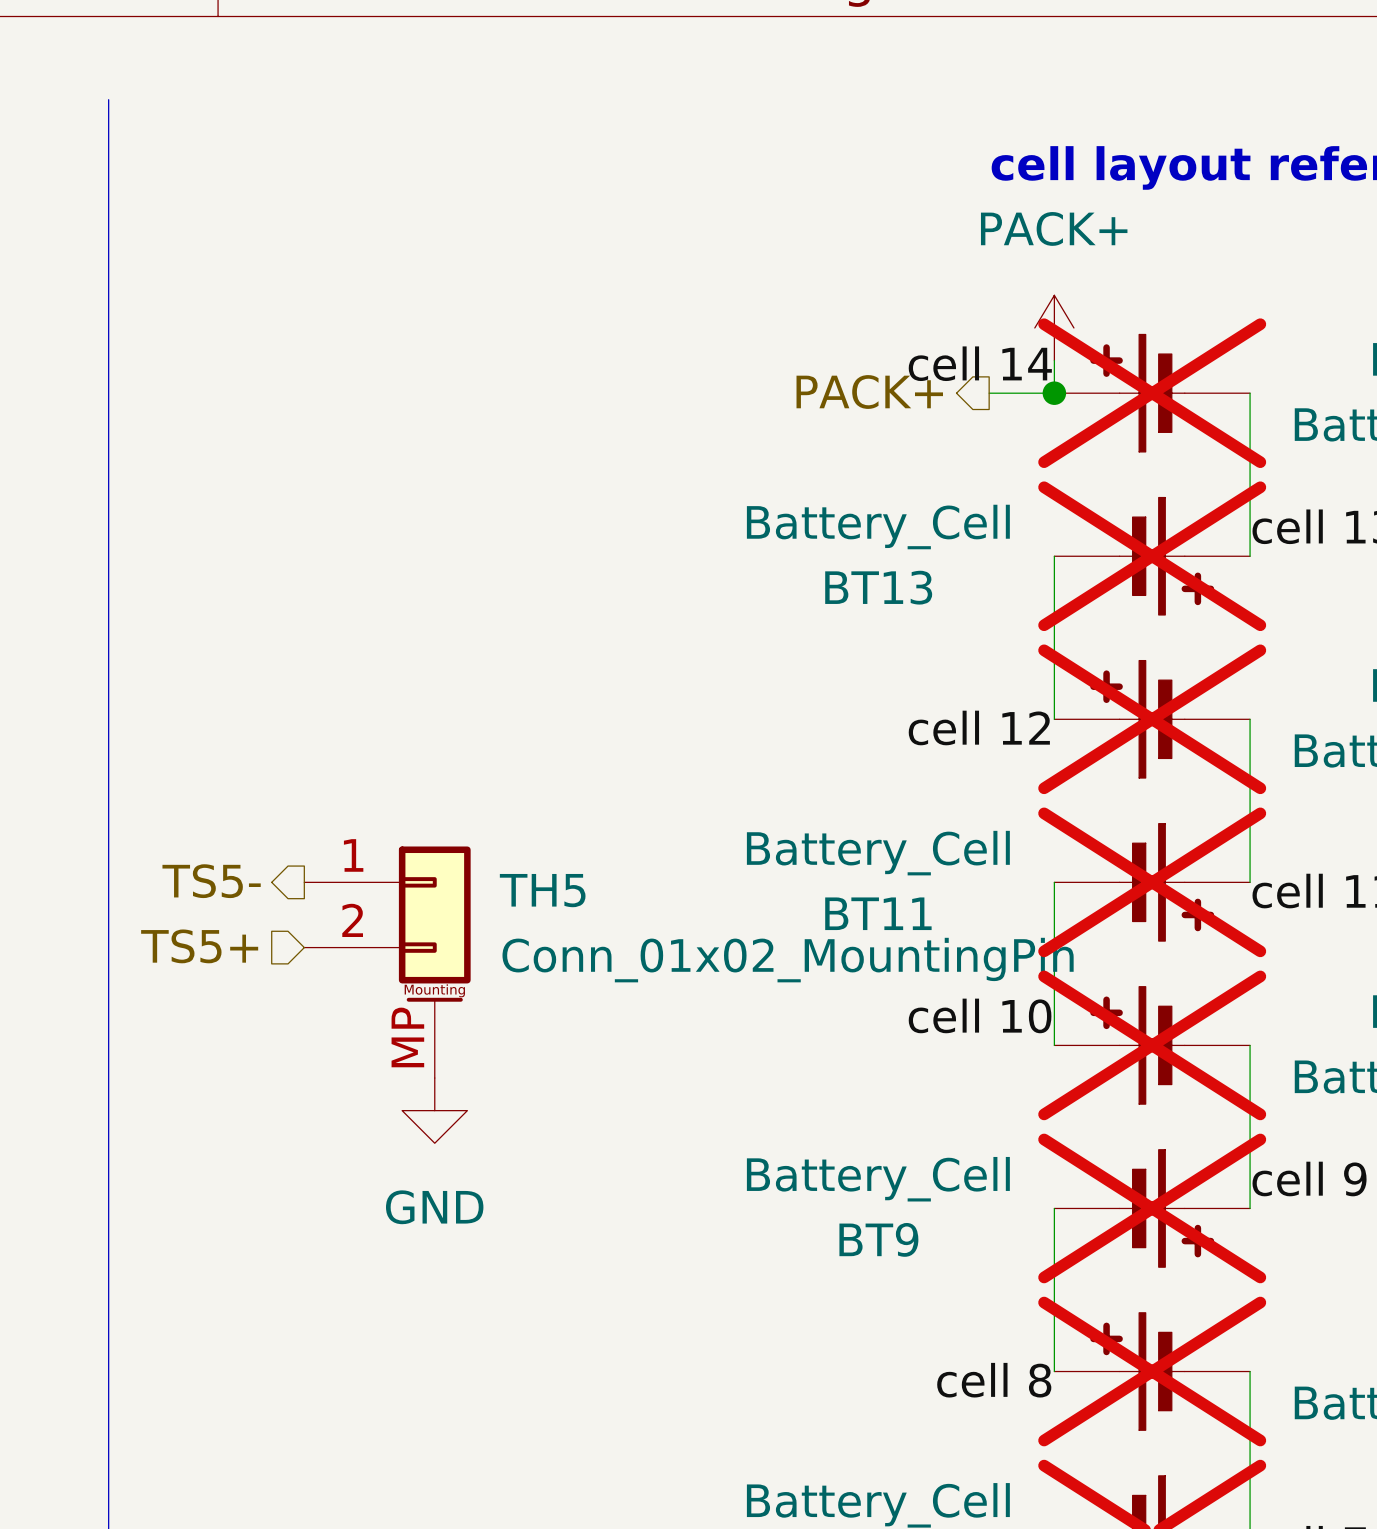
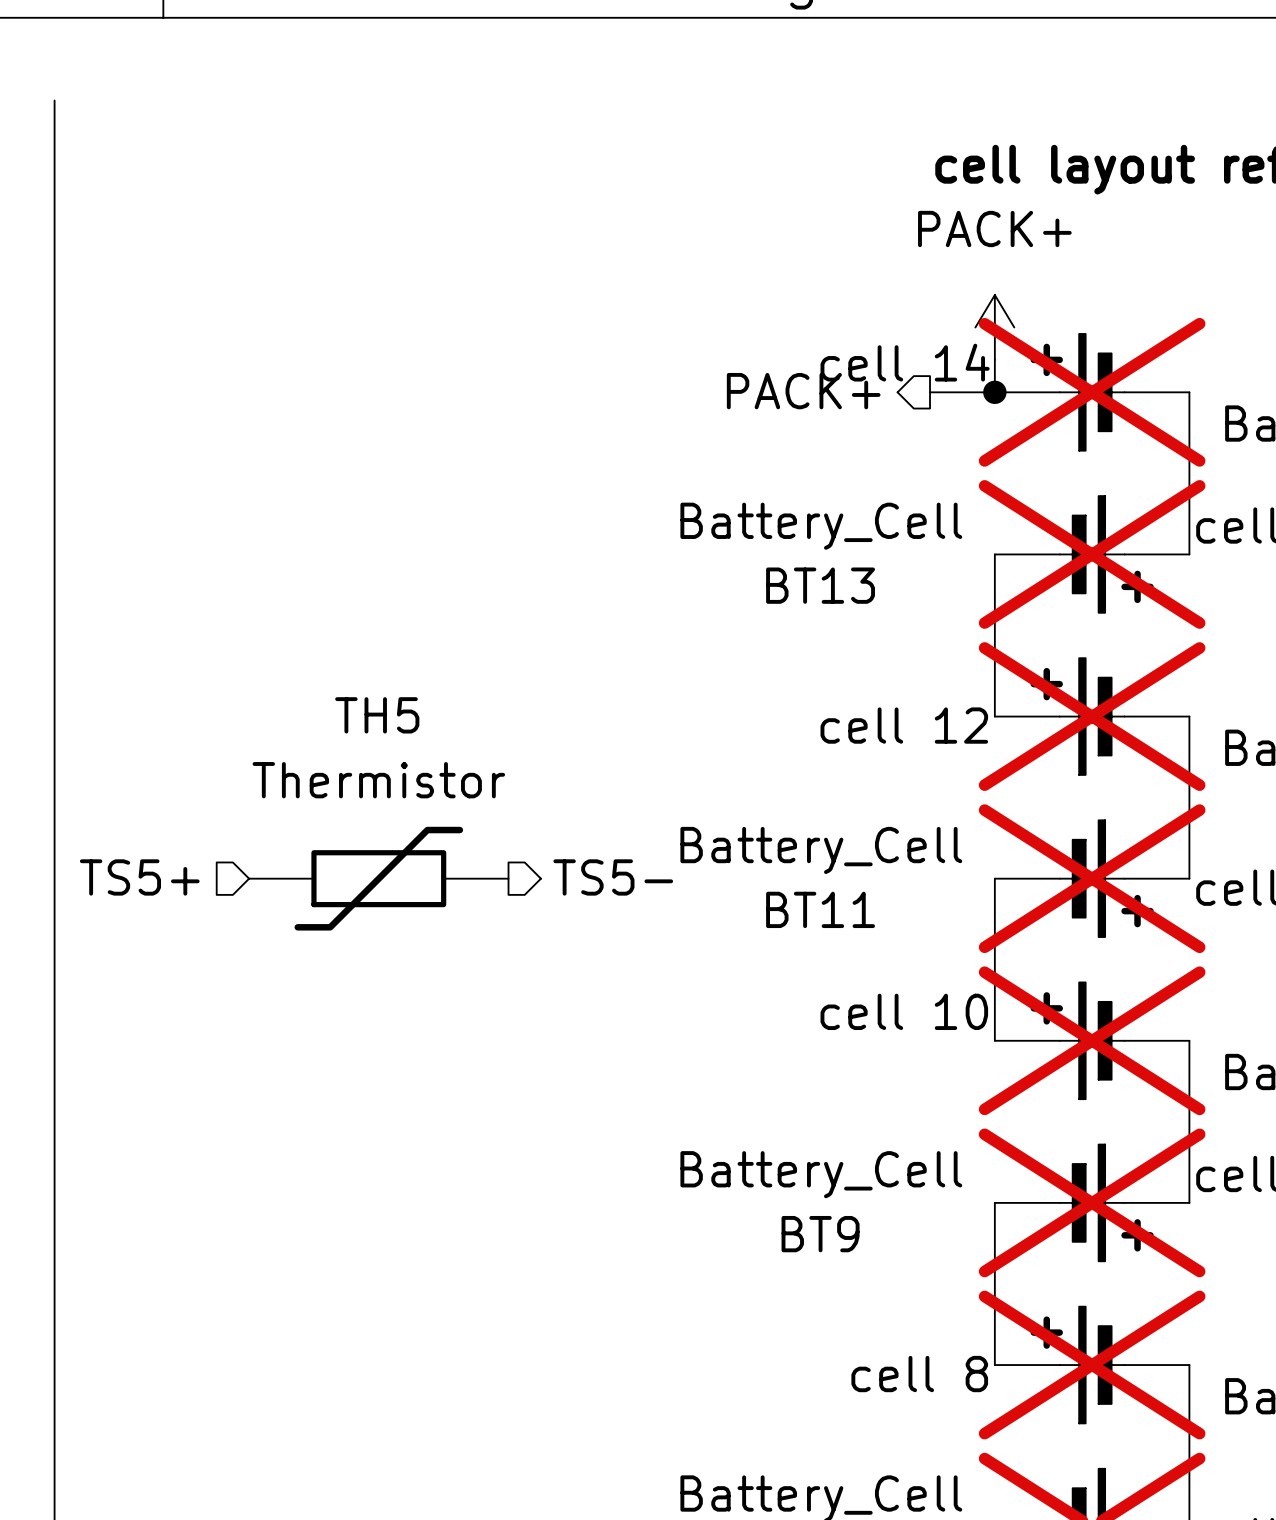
TH5 symbol: [304, 846, 471, 1079] -> [249, 826, 509, 931]
hierarchical label shape: output (211, 881) -> input (139, 877)
hierarchical label: TS5- (211, 881) -> TS5+ (139, 877)
hierarchical label: none -> TS5- (613, 877)
TH5 name position: TH5 (542, 890) -> TH5 (377, 715)
hierarchical label: TS5+ (199, 946) -> none
TH5 value: Conn_01x02_MountingPin (788, 960) -> Thermistor (378, 780)
power symbol: GND (434, 1110) -> none

